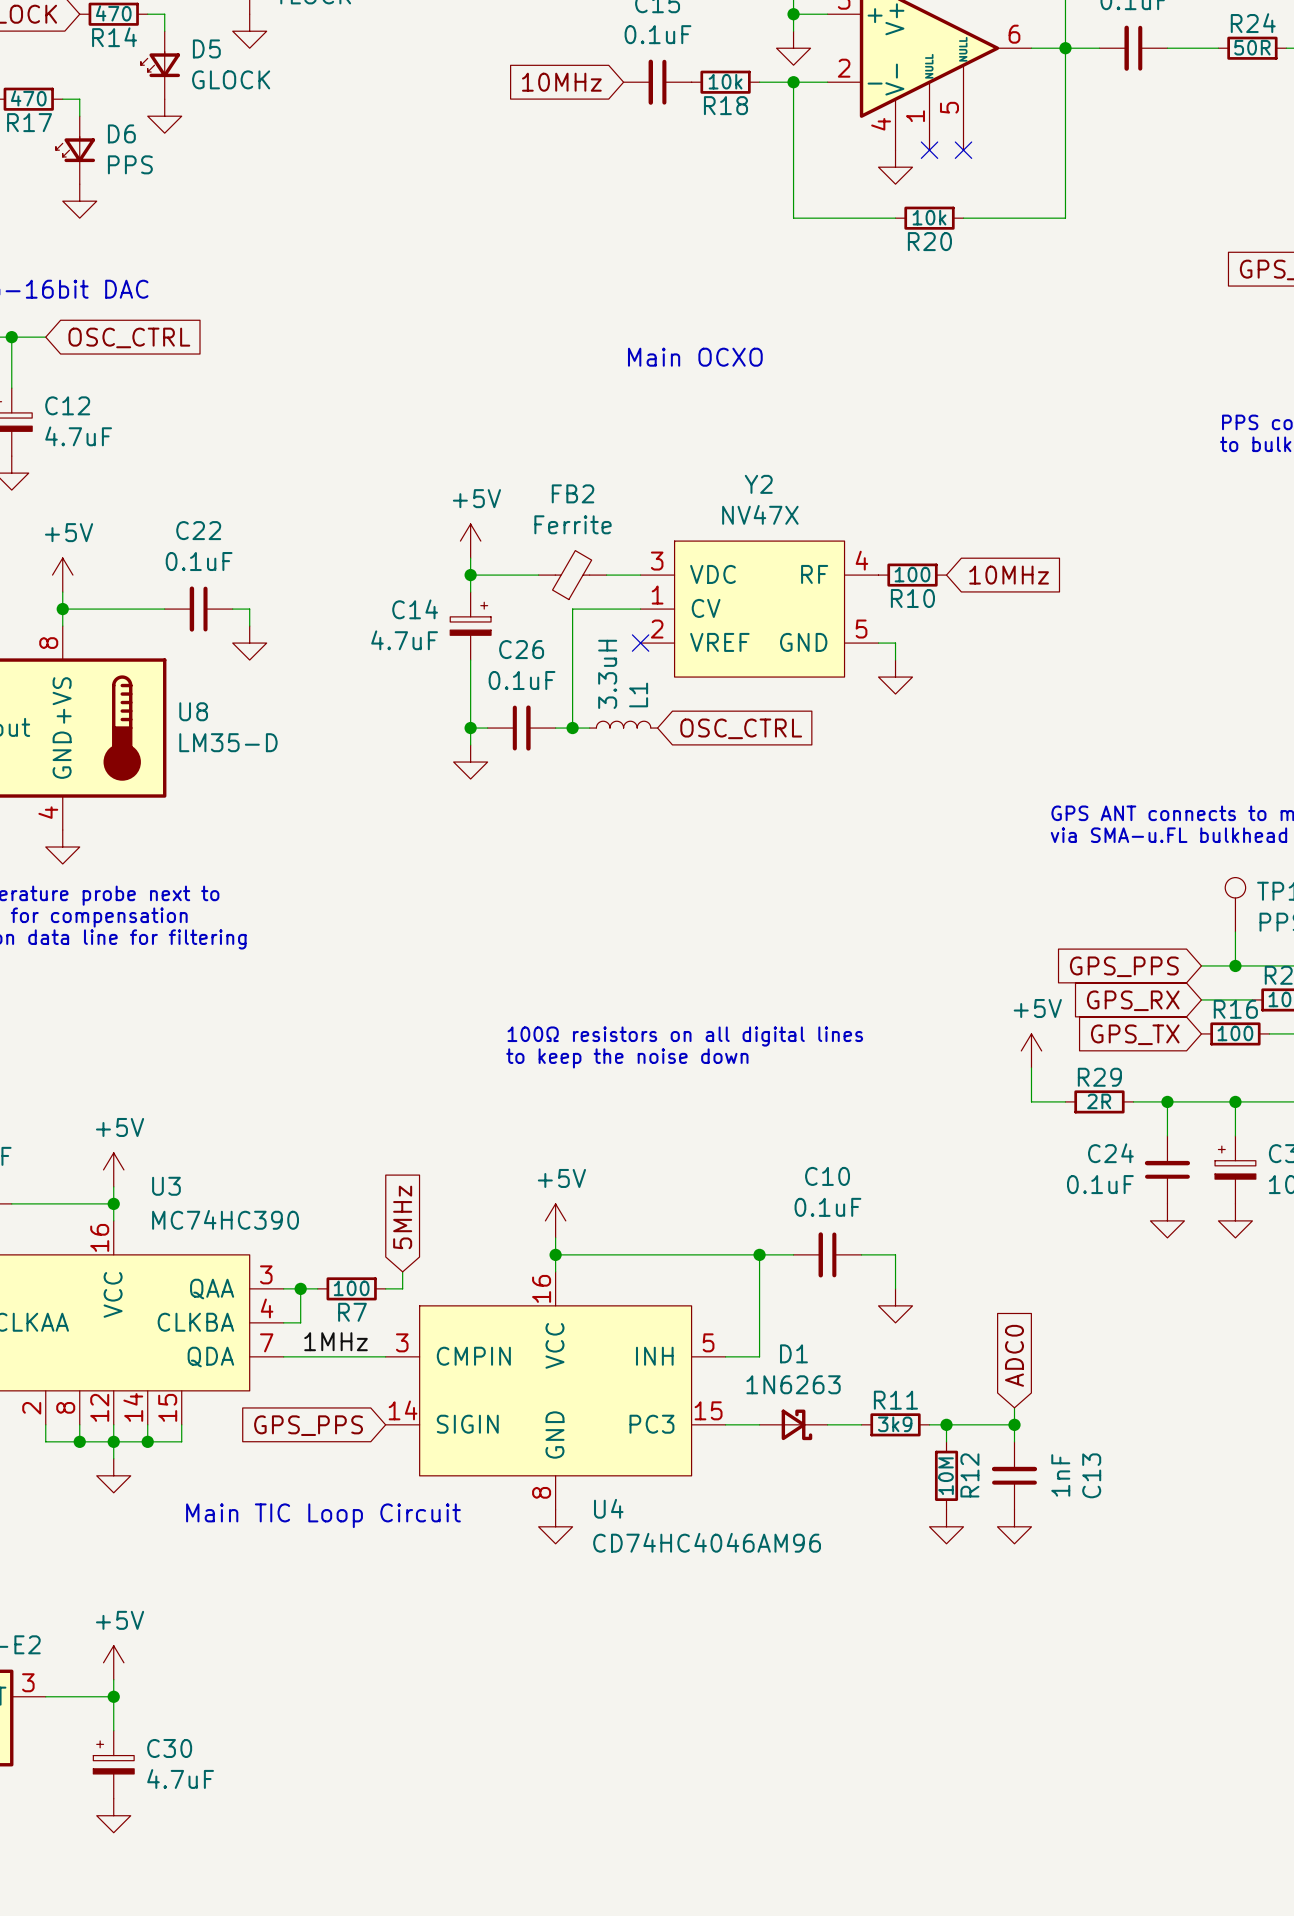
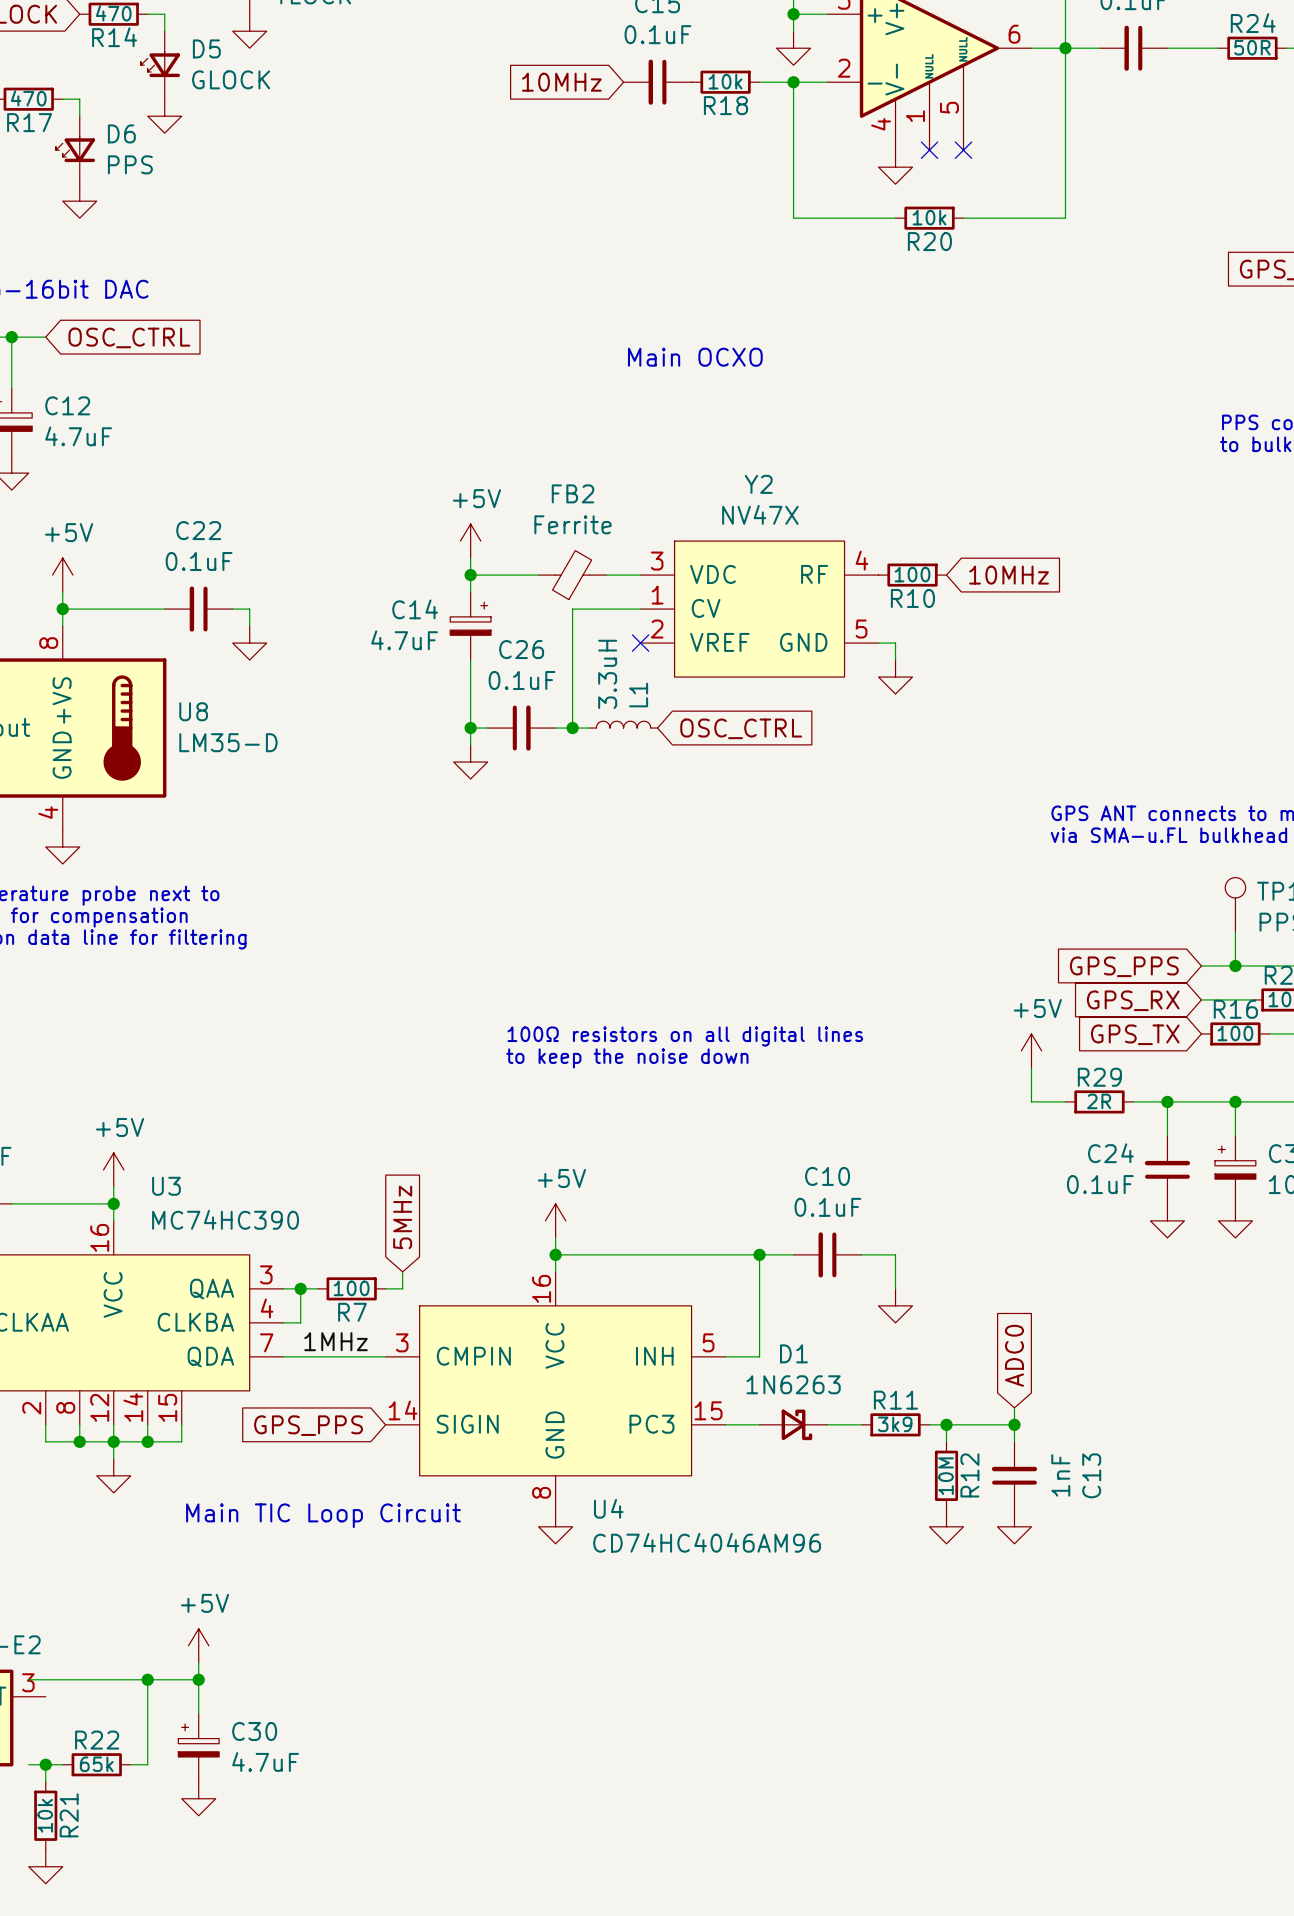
power symbol position: +5V (113, 1662) -> +5V (198, 1645)
wire: none -> (28, 1679) (198, 1679)
wire: (113, 1679) (113, 1730) -> (198, 1662) (198, 1713)
wire: none -> (147, 1679) (147, 1764) (130, 1764)
junction: none -> (198, 1679)
wire: (45, 1696) (113, 1696) -> none
junction position: (113, 1696) -> (147, 1679)
wire: none -> (28, 1764) (62, 1764)
wire: none -> (45, 1764) (45, 1781)
junction: none -> (45, 1764)
R22: none -> 65k (96, 1764)
C30 position: (113, 1764) -> (198, 1747)
power symbol: none -> (198, 1798)
R21: none -> 10k (45, 1815)
power symbol: (113, 1815) -> none
power symbol: none -> (45, 1866)

